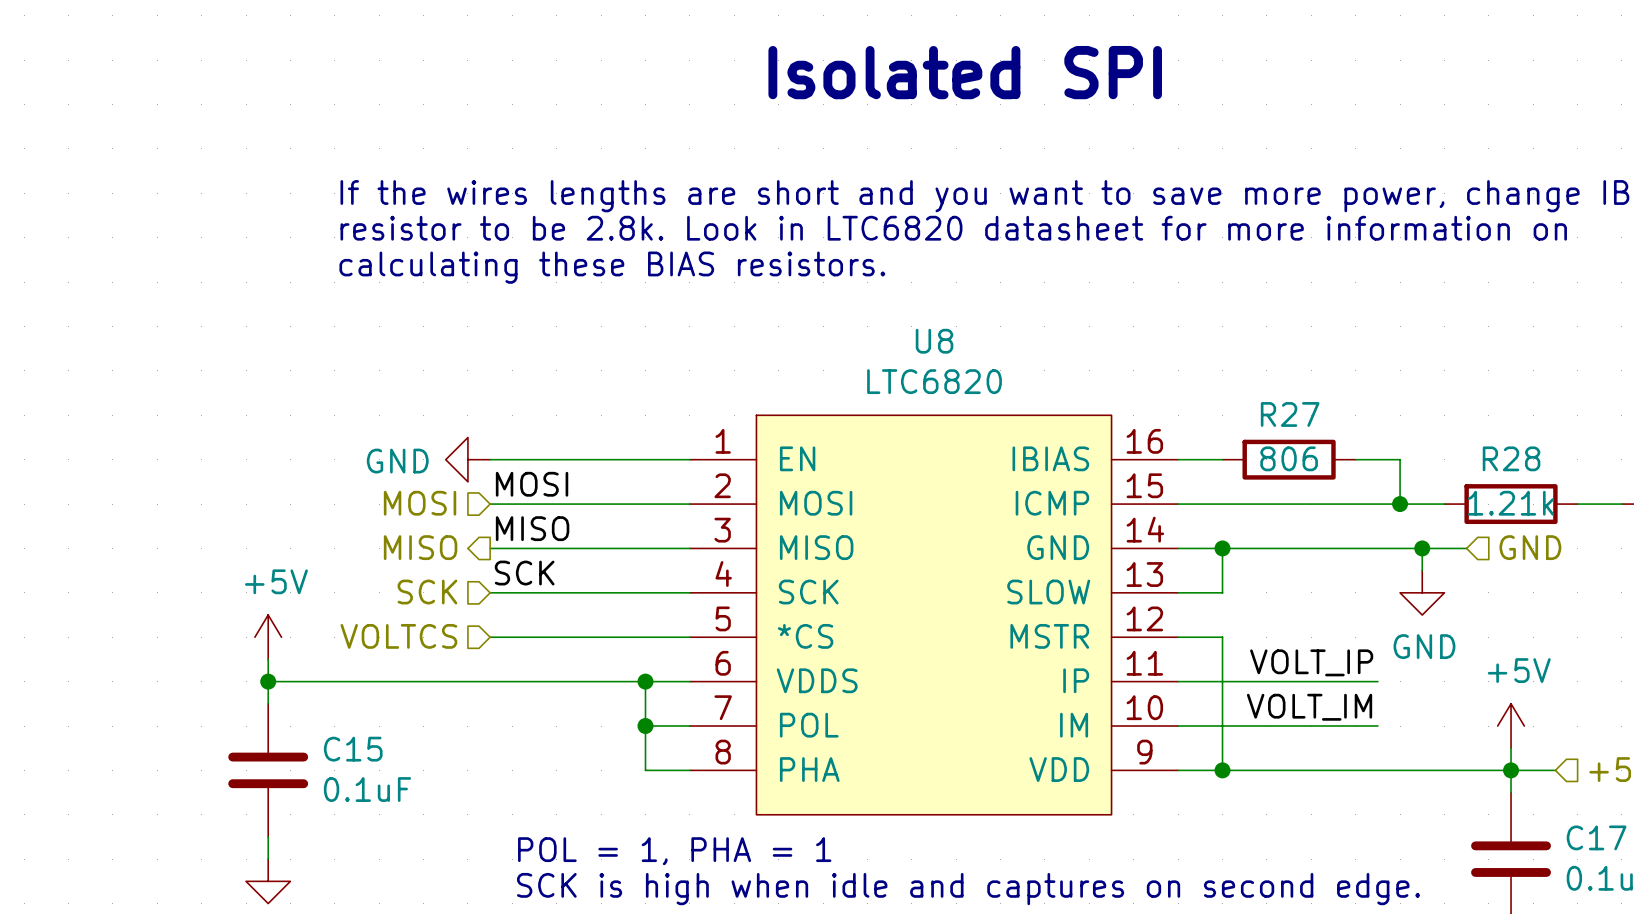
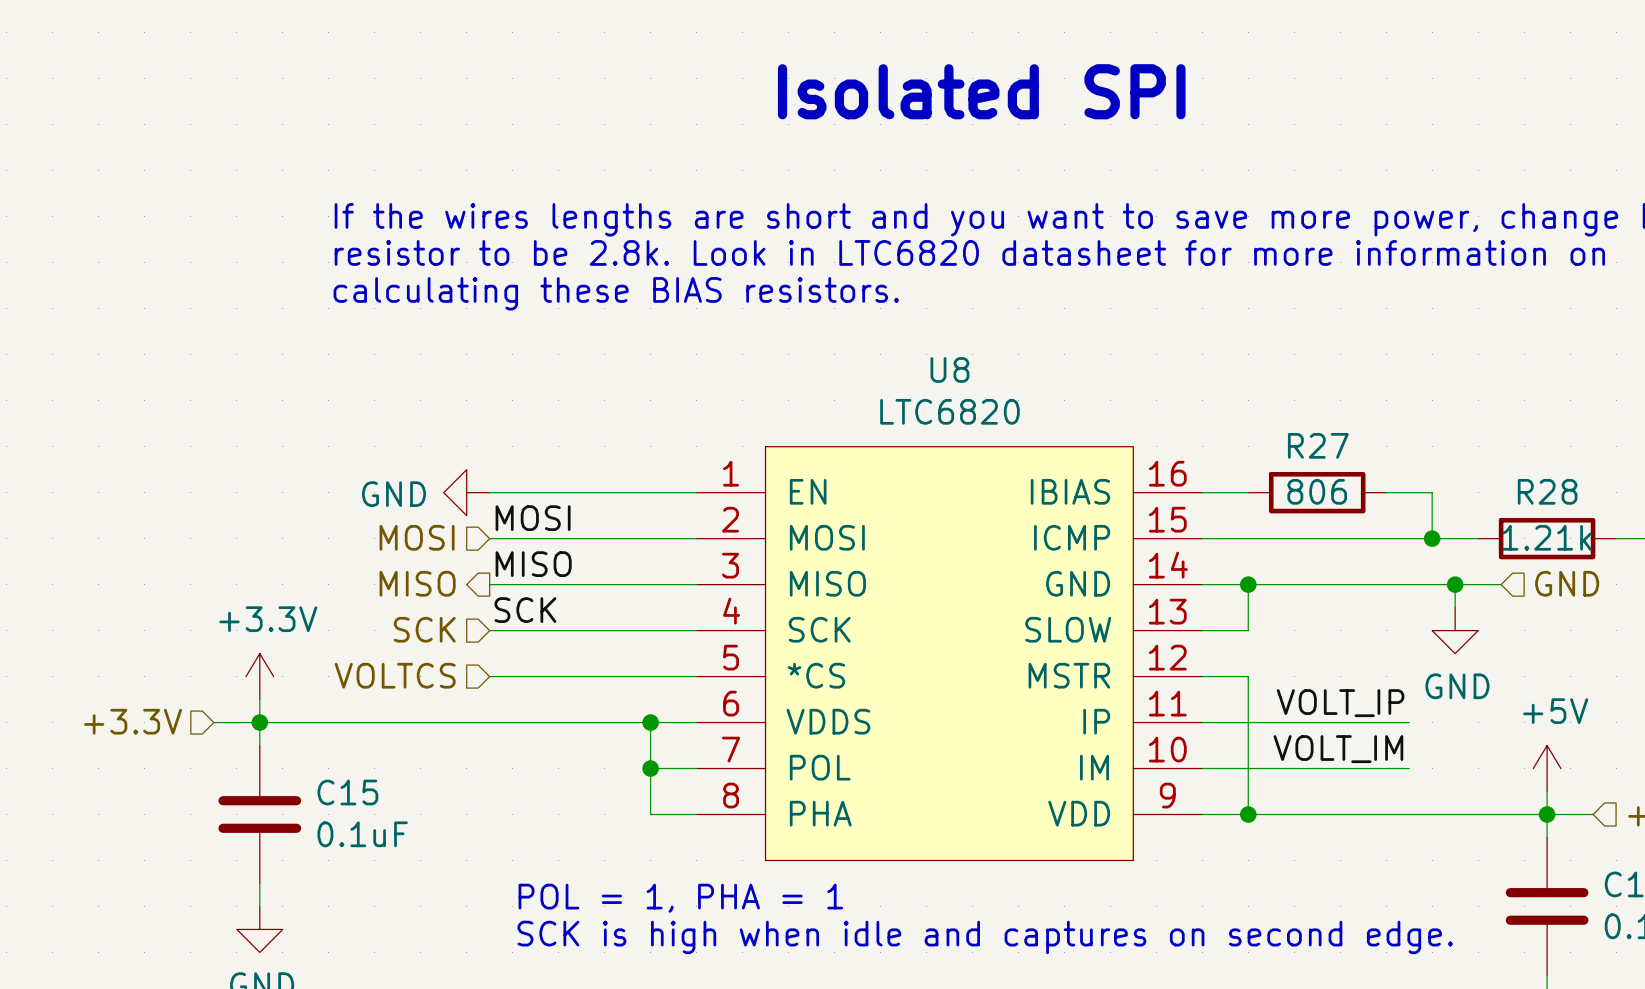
power symbol: +5V (268, 637) -> +3.3V (259, 676)
hierarchical label: none -> +3.3V (133, 721)
wire: none -> (213, 722) (259, 722)

